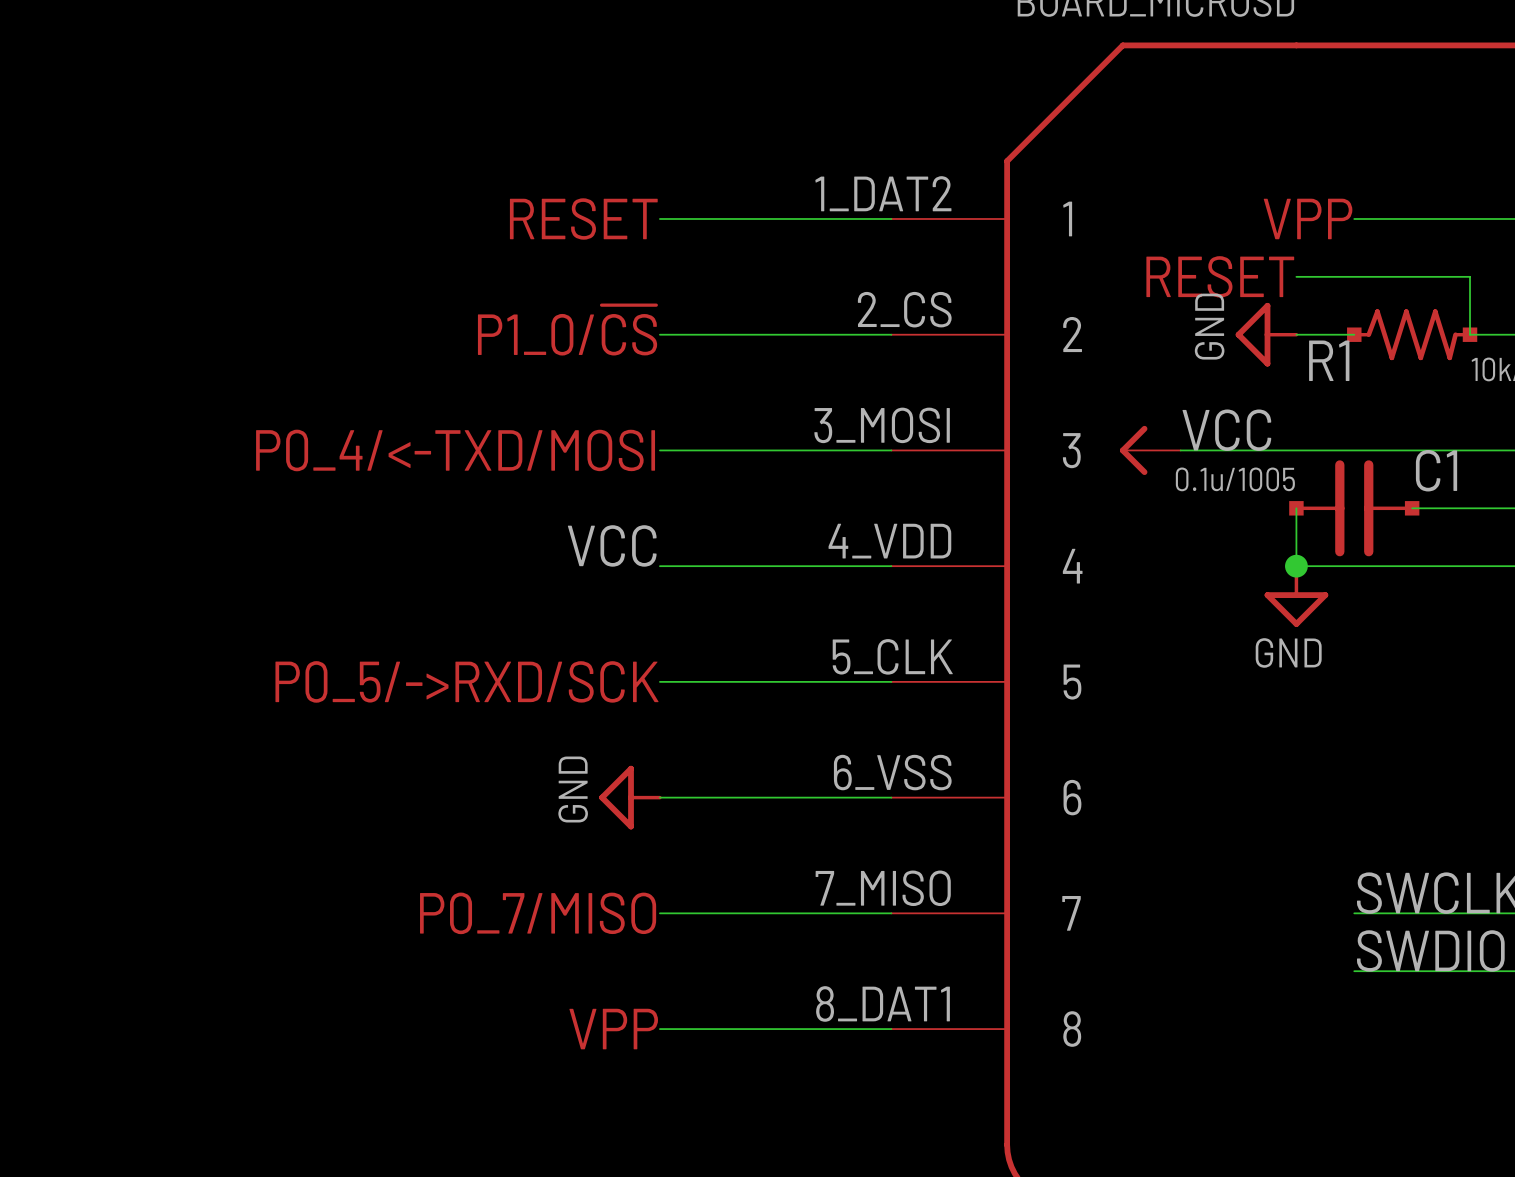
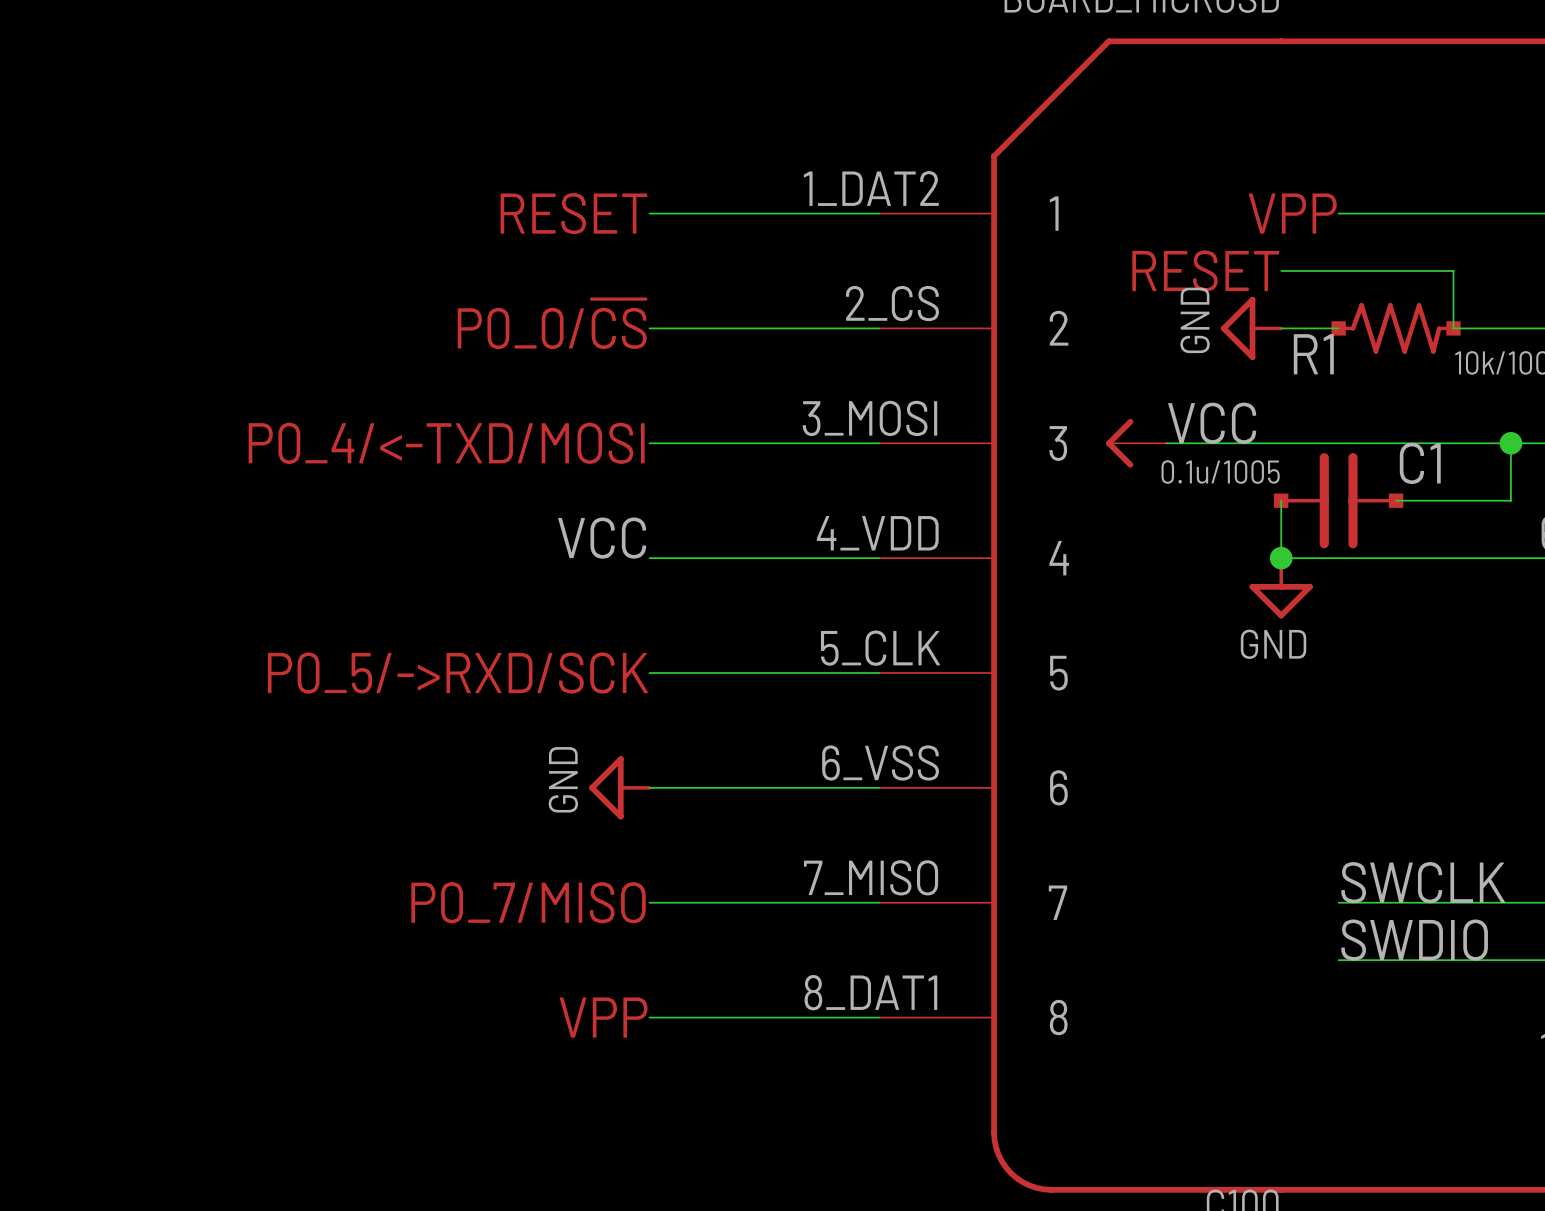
text: P1_0/~{CS} (567, 330) -> P0_0/~{CS} (552, 324)

